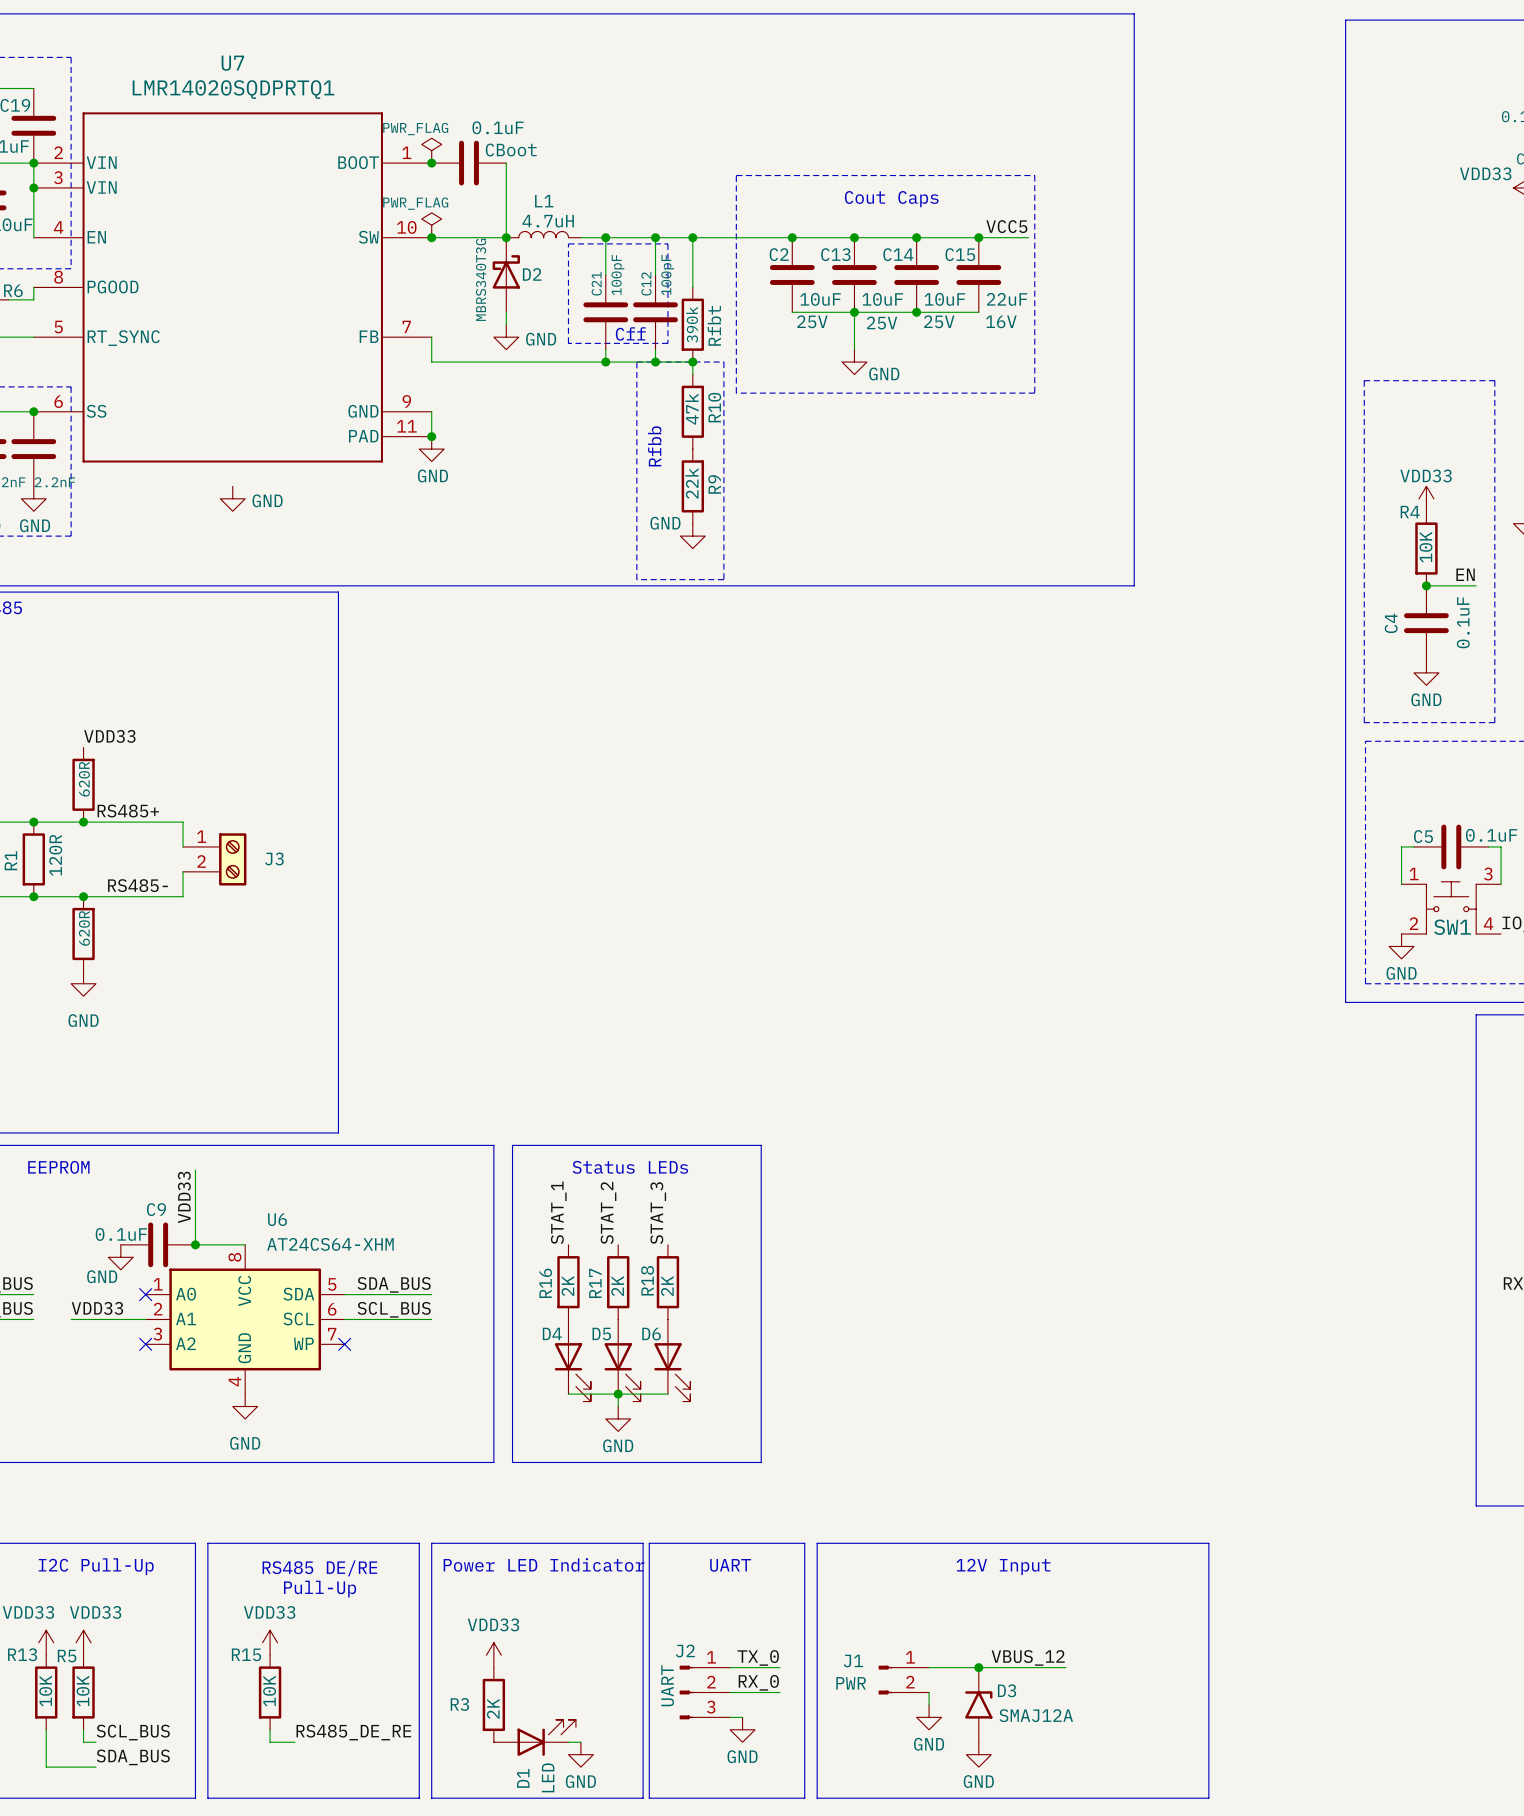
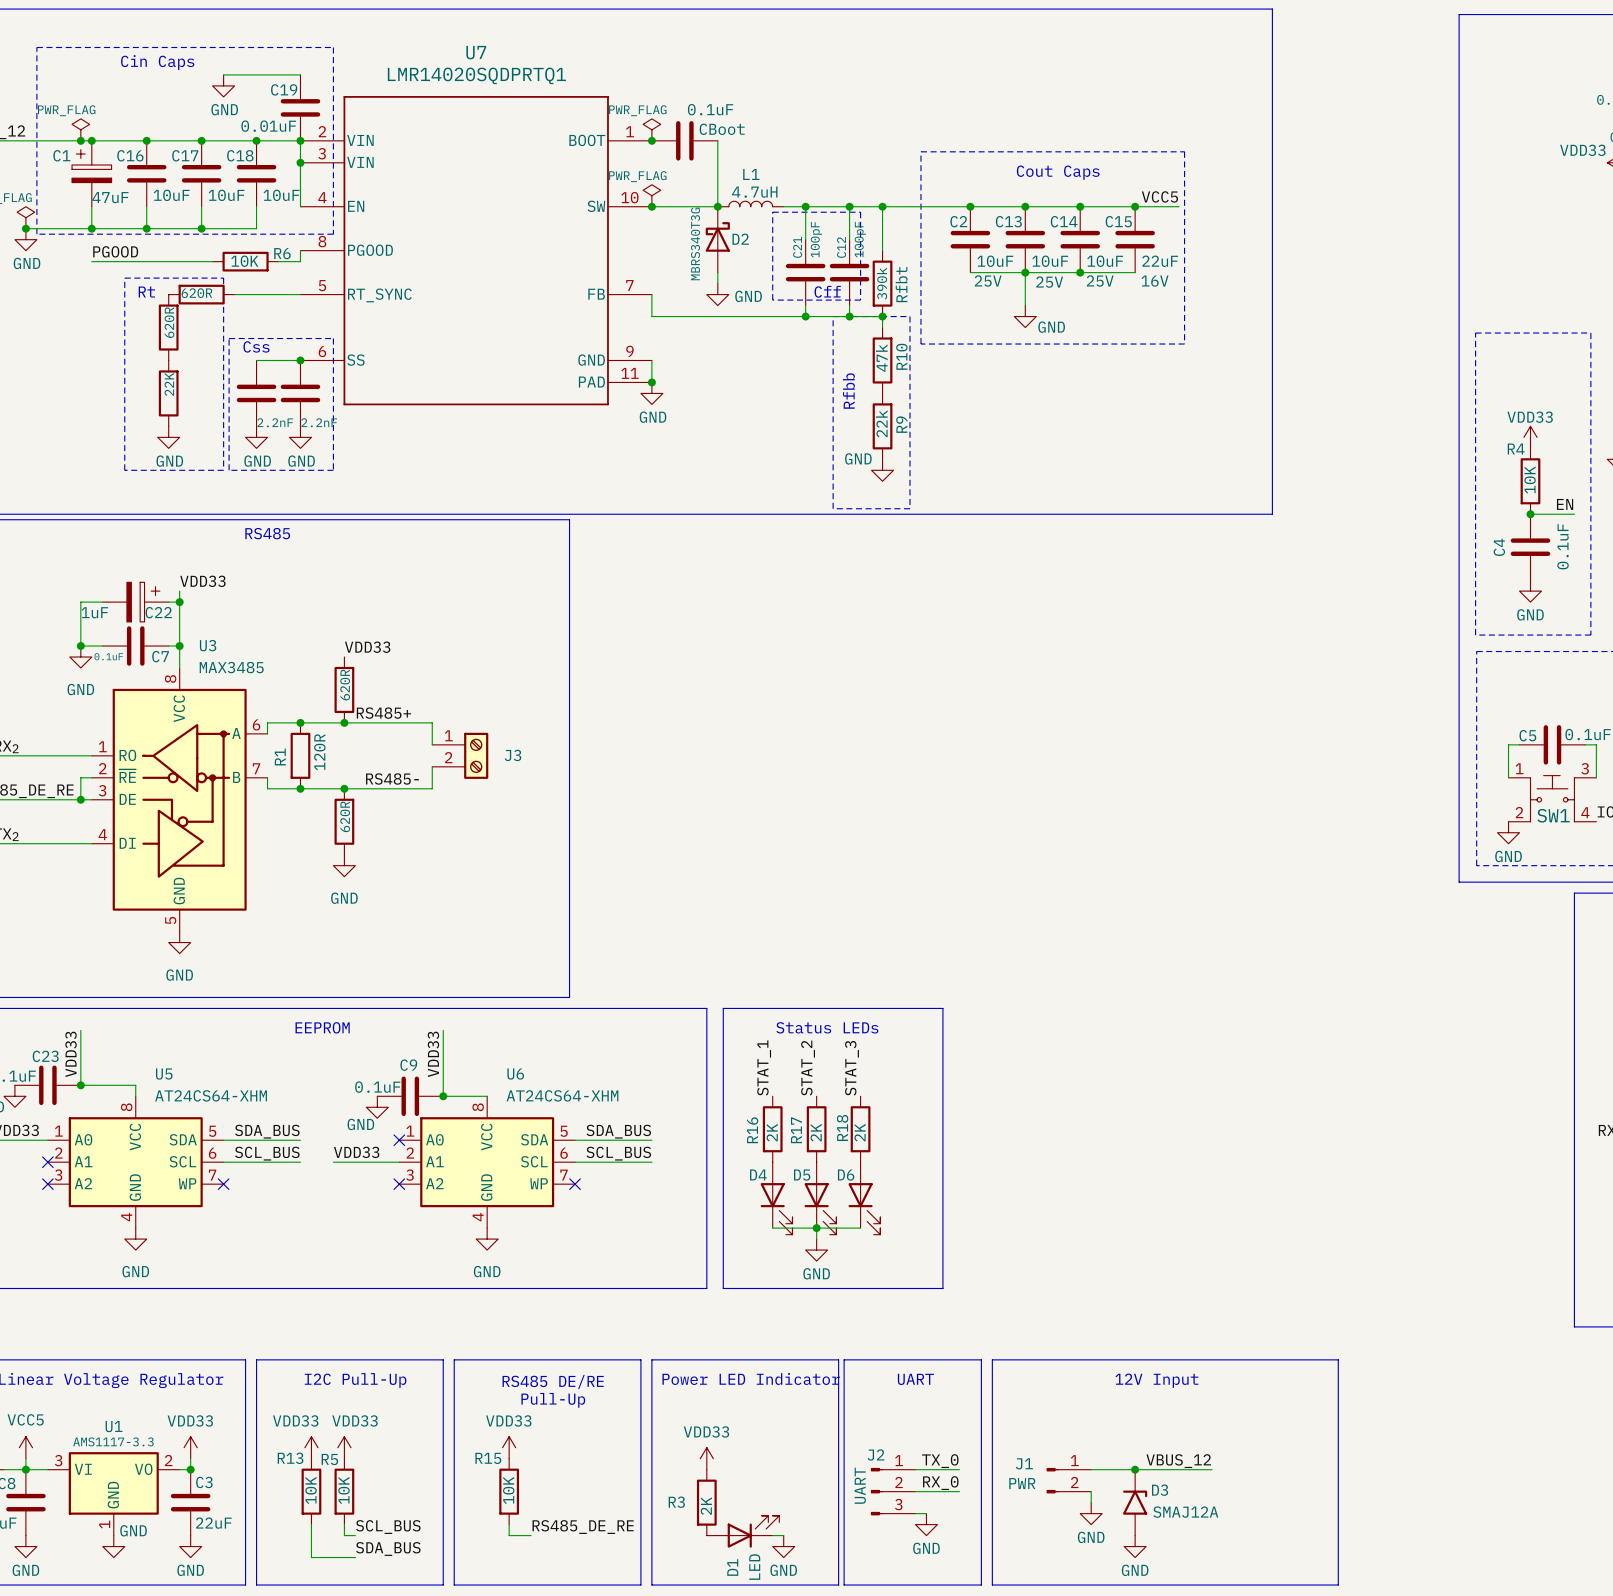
power symbol: GND (232, 498) -> none

